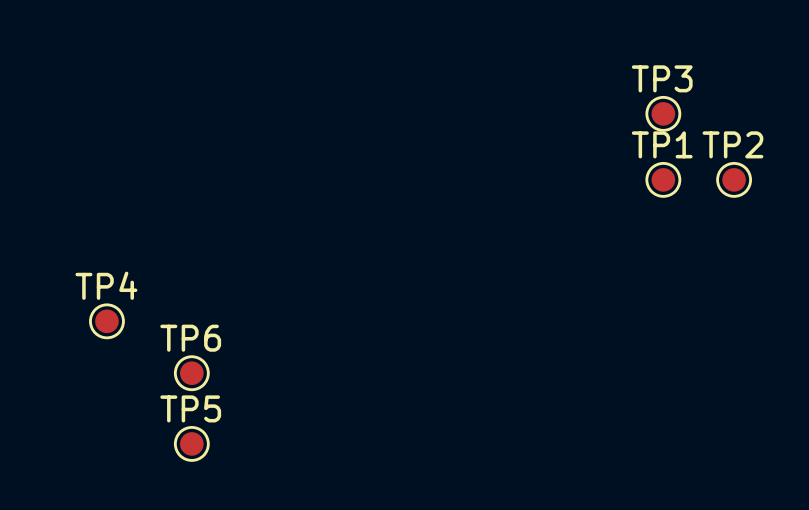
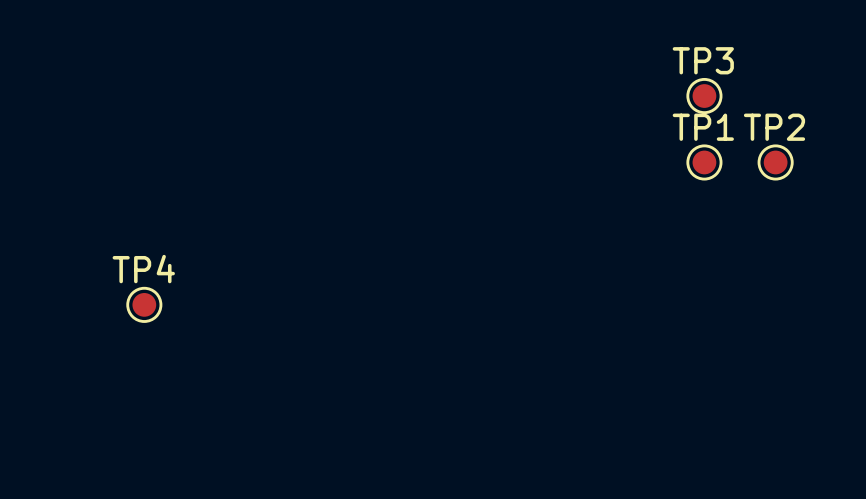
TP6: (191, 373) -> none
TP5: (191, 443) -> none

